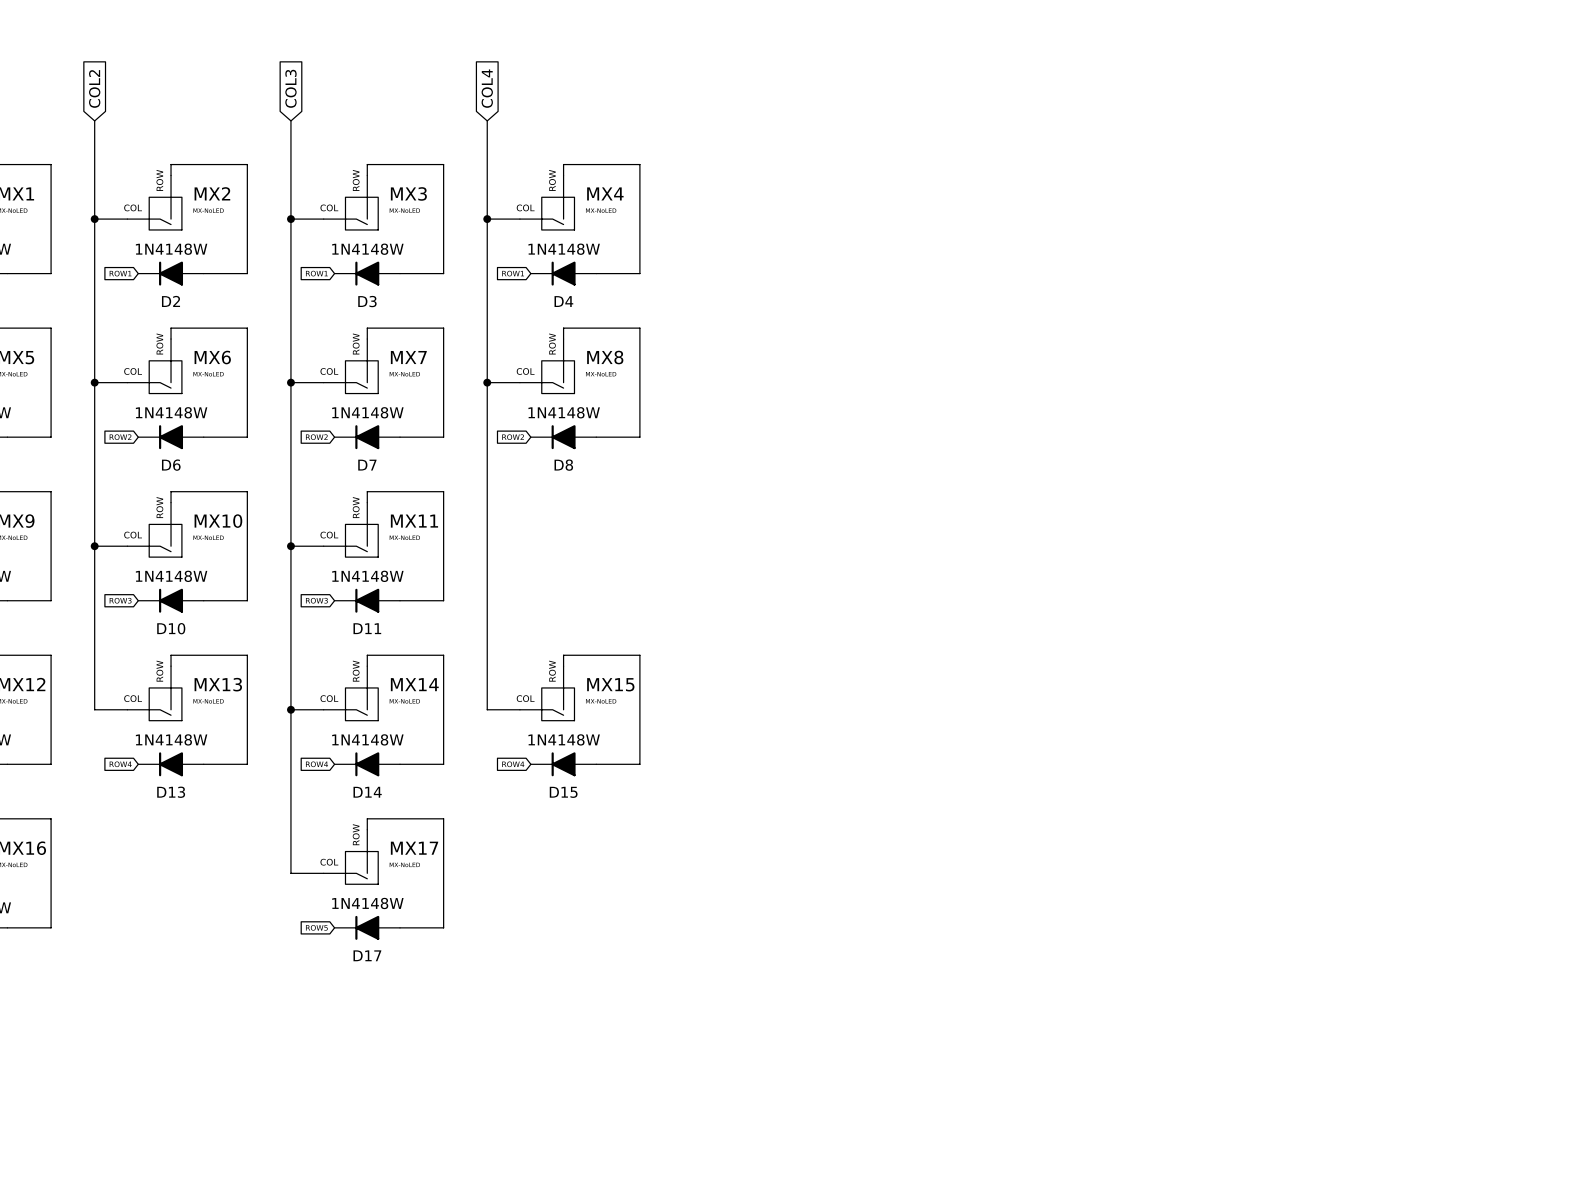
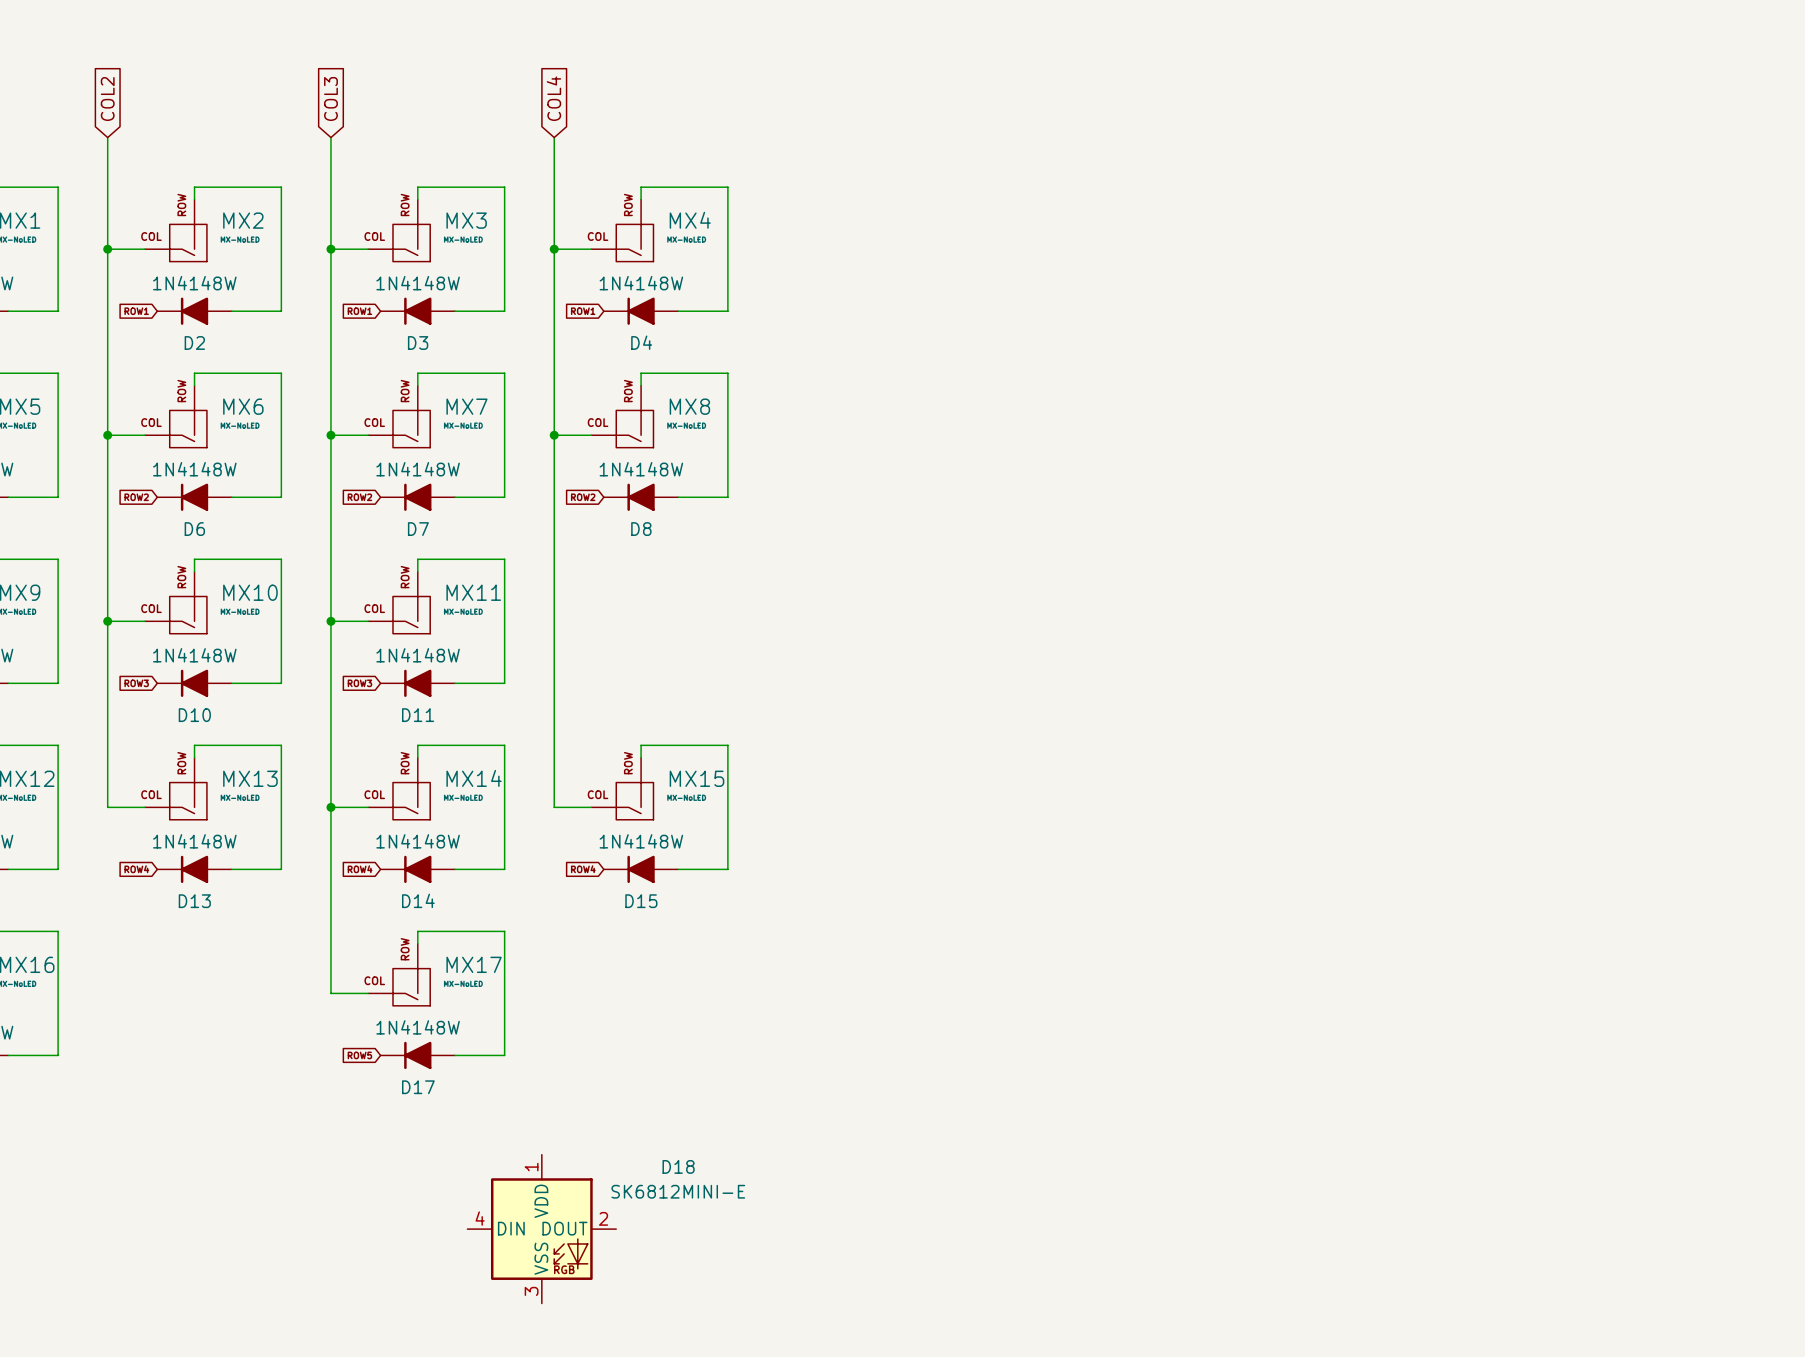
D18: none -> SK6812MINI-E (541, 1229)

